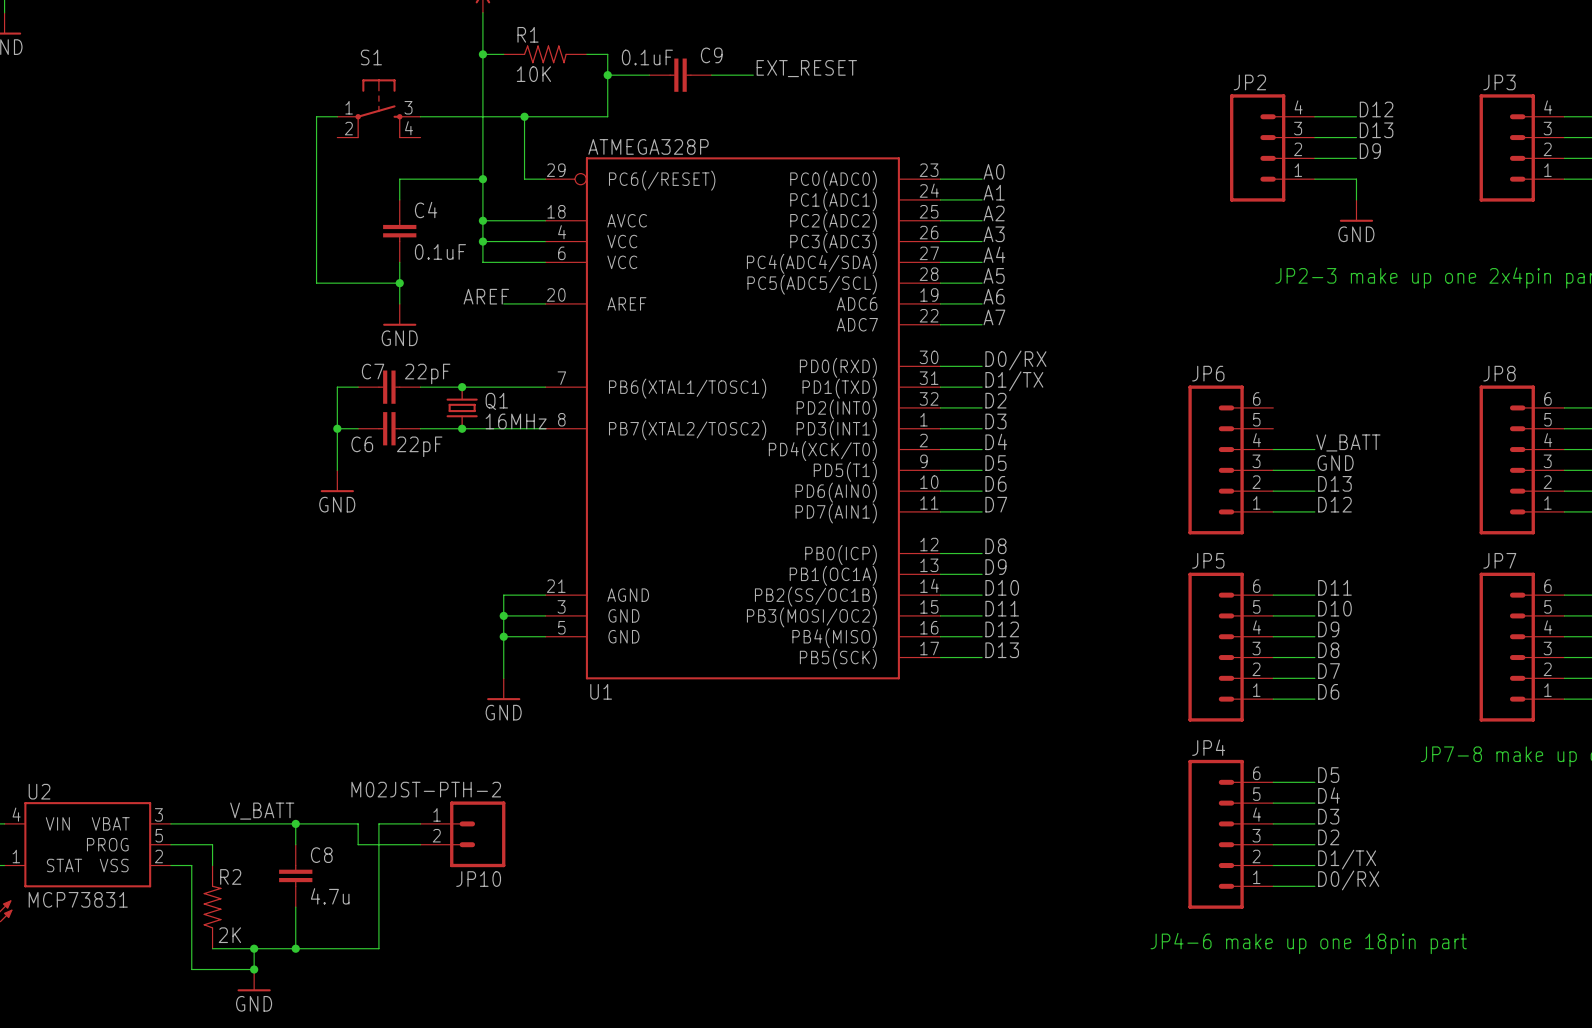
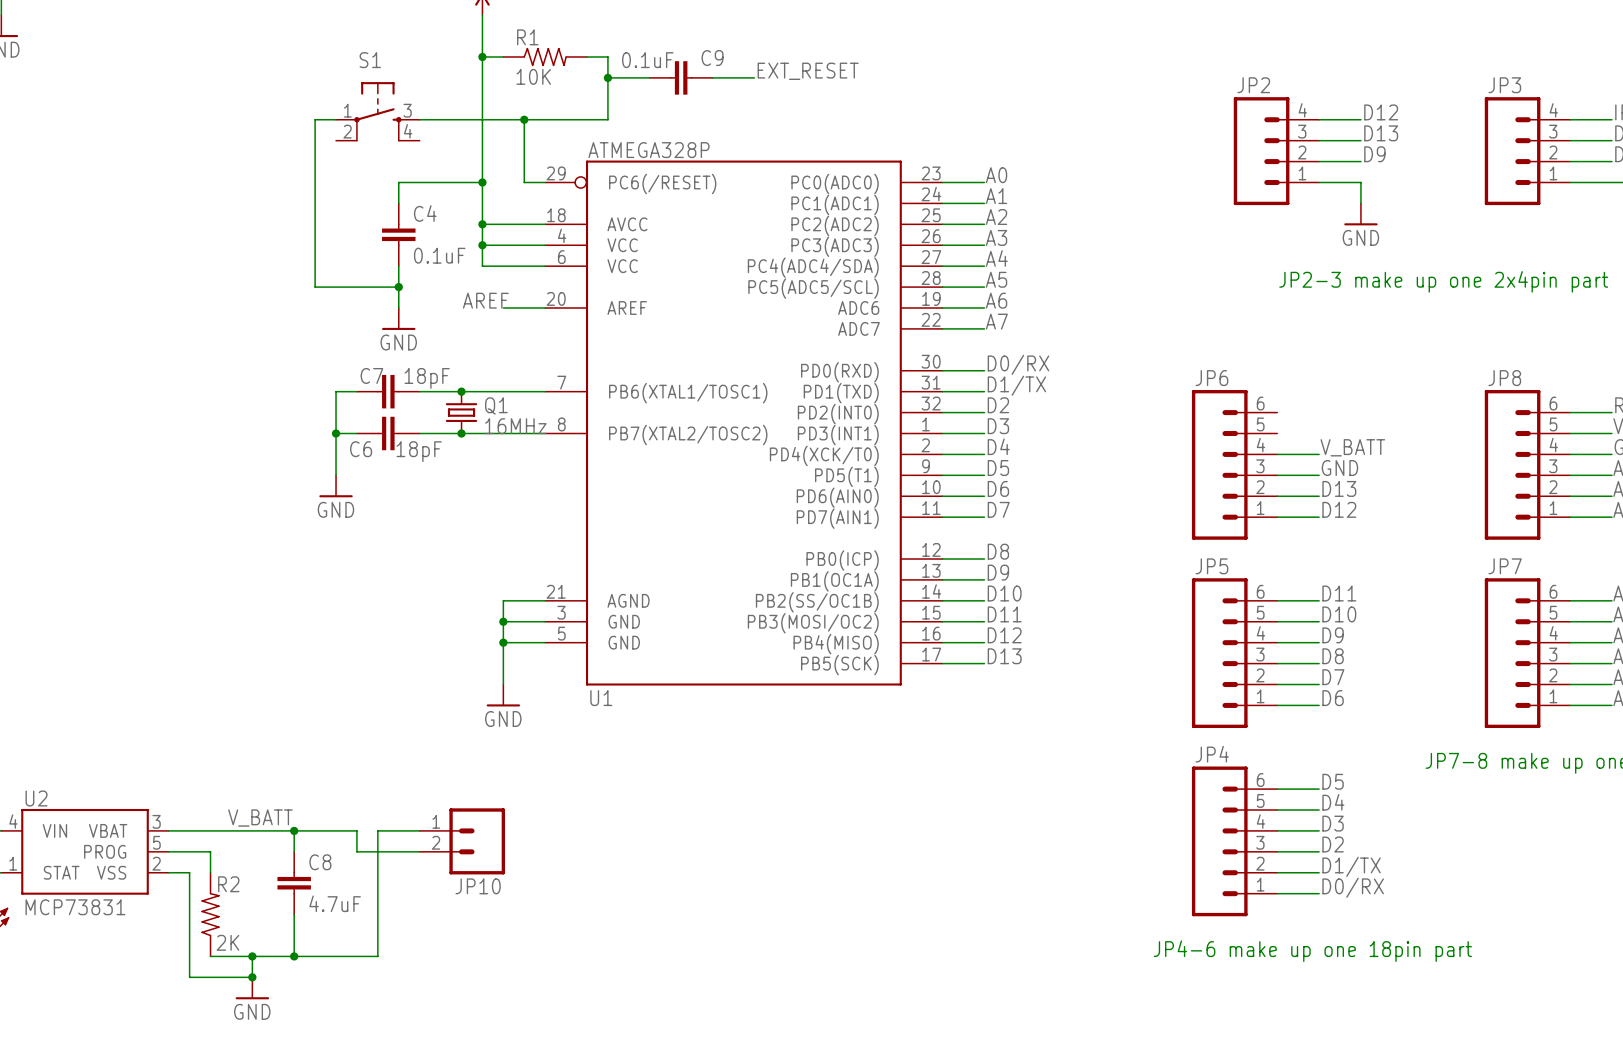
C7 value: 22pF (427, 373) -> 18pF (427, 378)
C6 value: 22pF (419, 446) -> 18pF (419, 451)
JP10 value: M02JST-PTH-2 (426, 789) -> none
C8 value: 4.7u (330, 896) -> 4.7uF (335, 903)

